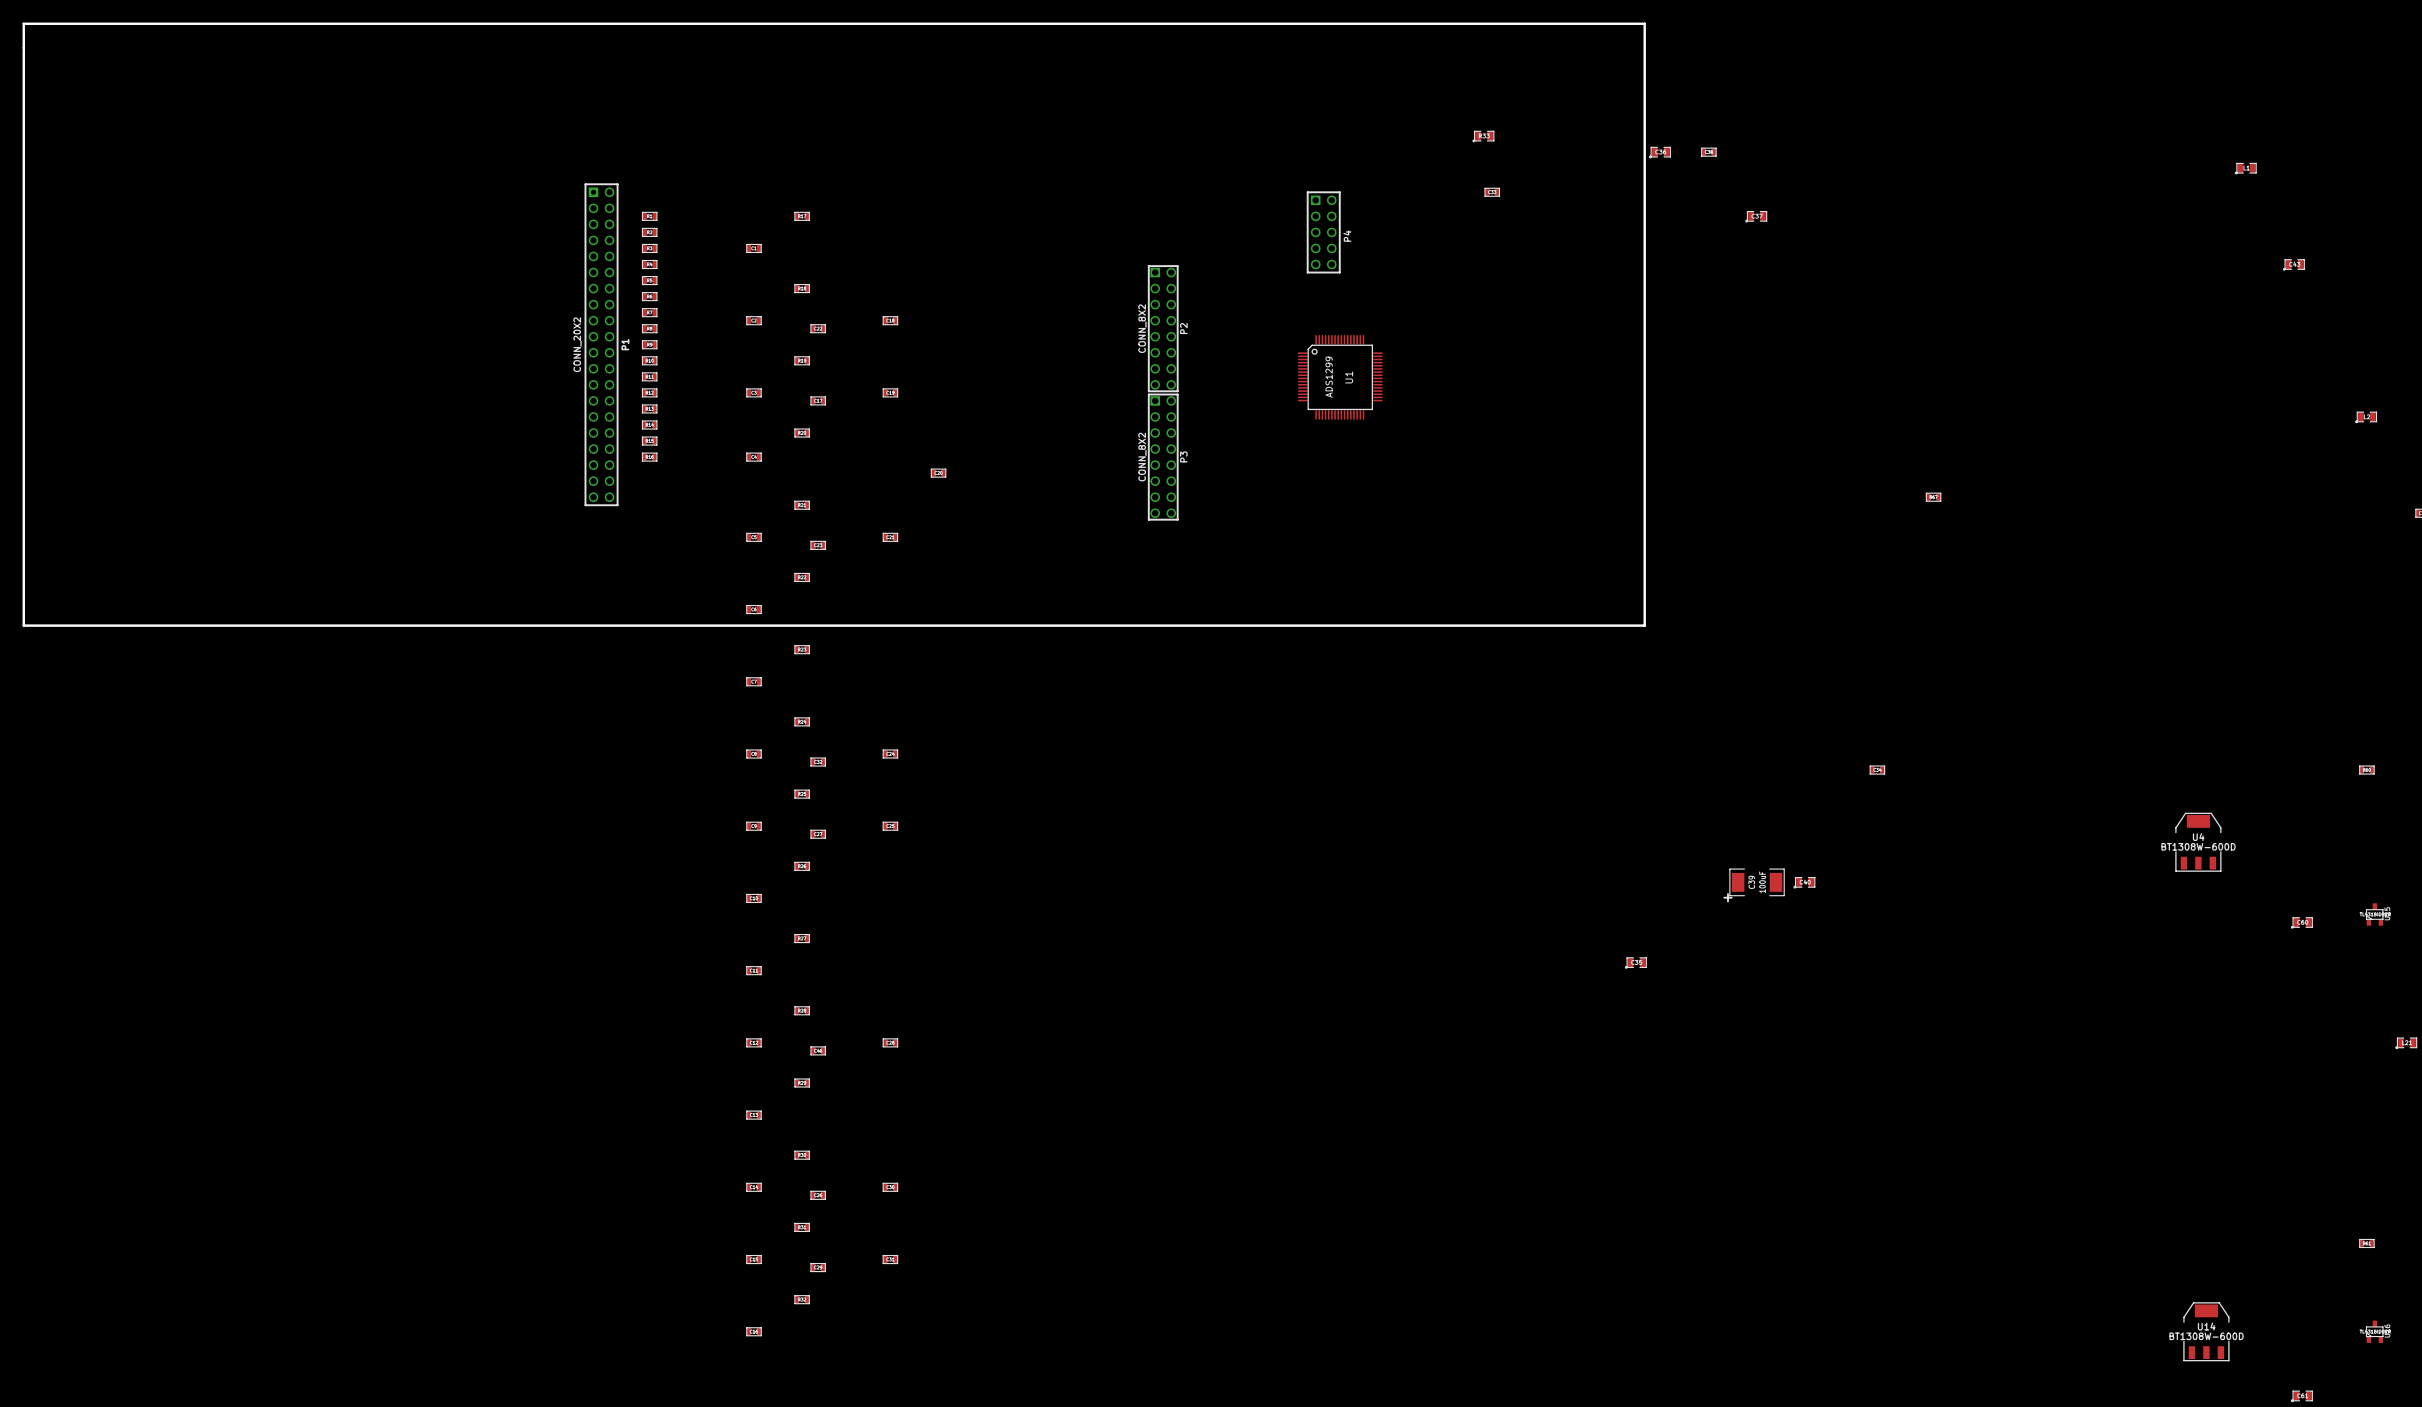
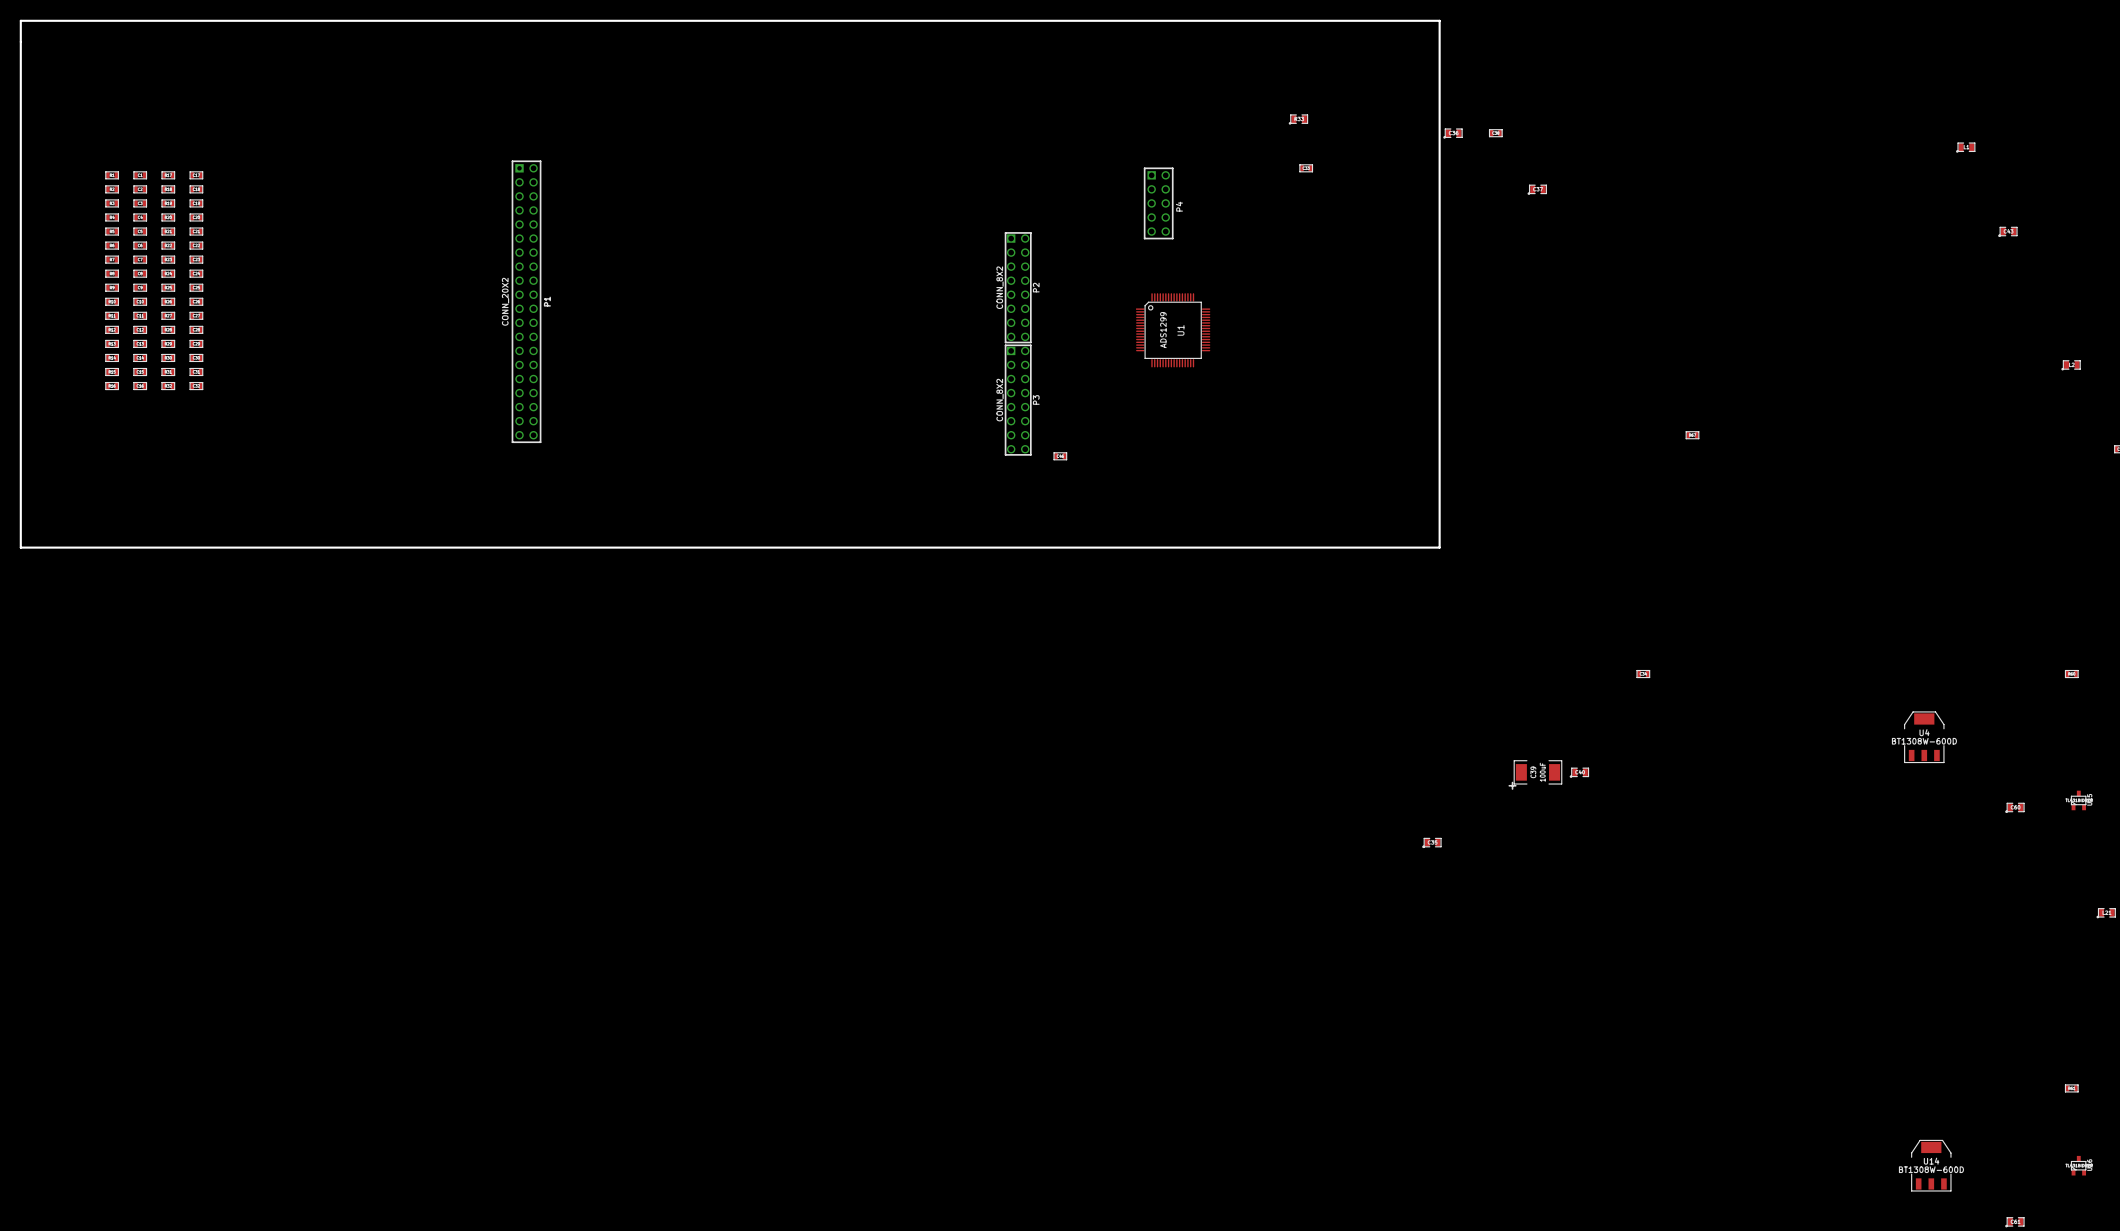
part position: (649, 216) -> (112, 175)
part position: (802, 216) -> (168, 175)
part position: (649, 232) -> (112, 189)
part position: (649, 248) -> (112, 203)
part position: (753, 248) -> (140, 175)
part position: (649, 264) -> (112, 217)
part position: (649, 280) -> (112, 231)
part position: (802, 288) -> (168, 189)
part position: (649, 296) -> (112, 245)
part position: (649, 312) -> (112, 259)
part position: (753, 320) -> (140, 189)
part position: (890, 320) -> (196, 189)
part position: (649, 328) -> (112, 273)
part position: (818, 328) -> (196, 245)
part position: (649, 344) -> (112, 287)
part position: (649, 360) -> (112, 301)
part position: (802, 360) -> (168, 203)
part position: (649, 376) -> (112, 315)
part position: (649, 392) -> (112, 329)
part position: (753, 392) -> (140, 203)
part position: (890, 392) -> (196, 203)
part position: (818, 400) -> (196, 175)
part position: (649, 408) -> (112, 343)
part position: (649, 424) -> (112, 357)
part position: (802, 433) -> (168, 217)
part position: (649, 441) -> (112, 372)
part position: (649, 457) -> (112, 386)
part position: (753, 457) -> (140, 217)
part position: (938, 473) -> (196, 217)
part position: (802, 505) -> (168, 231)
part position: (753, 537) -> (140, 231)
part position: (890, 537) -> (196, 231)
part position: (818, 545) -> (196, 259)
part position: (802, 577) -> (168, 245)
part position: (753, 609) -> (140, 245)
part position: (802, 649) -> (168, 259)
part position: (753, 681) -> (140, 259)
part position: (802, 721) -> (168, 273)
part position: (753, 753) -> (140, 273)
part position: (890, 753) -> (196, 273)
part position: (818, 762) -> (196, 386)
part position: (802, 794) -> (168, 287)
part position: (753, 826) -> (140, 287)
part position: (890, 826) -> (196, 287)
part position: (818, 834) -> (196, 315)
part position: (802, 866) -> (168, 301)
part position: (753, 898) -> (140, 301)
part position: (802, 938) -> (168, 315)
part position: (753, 970) -> (140, 315)
part position: (802, 1010) -> (168, 329)
part position: (753, 1042) -> (140, 329)
part position: (890, 1042) -> (196, 329)
part position: (818, 1050) -> (1060, 456)
part position: (802, 1082) -> (168, 343)
part position: (753, 1115) -> (140, 343)
part position: (802, 1155) -> (168, 357)
part position: (753, 1187) -> (140, 357)
part position: (890, 1187) -> (196, 357)
part position: (818, 1195) -> (196, 301)
part position: (802, 1227) -> (168, 372)
part position: (753, 1259) -> (140, 372)
part position: (890, 1259) -> (196, 372)
part position: (818, 1267) -> (196, 343)
part position: (802, 1299) -> (168, 386)
part position: (753, 1331) -> (140, 386)

